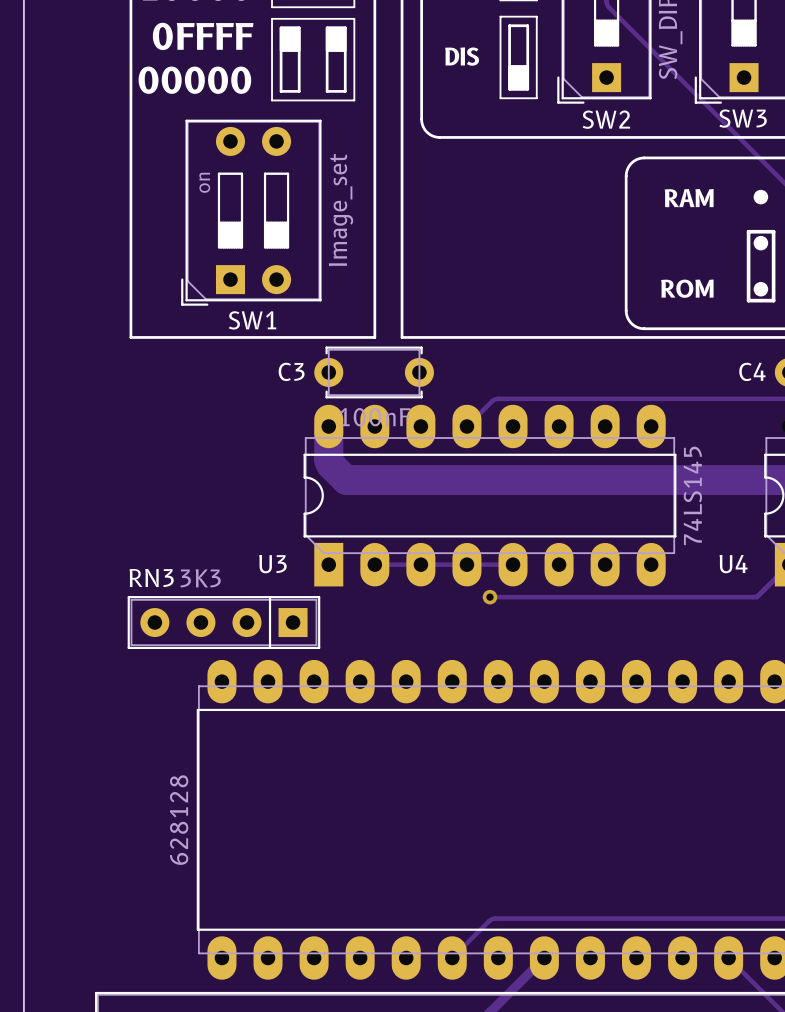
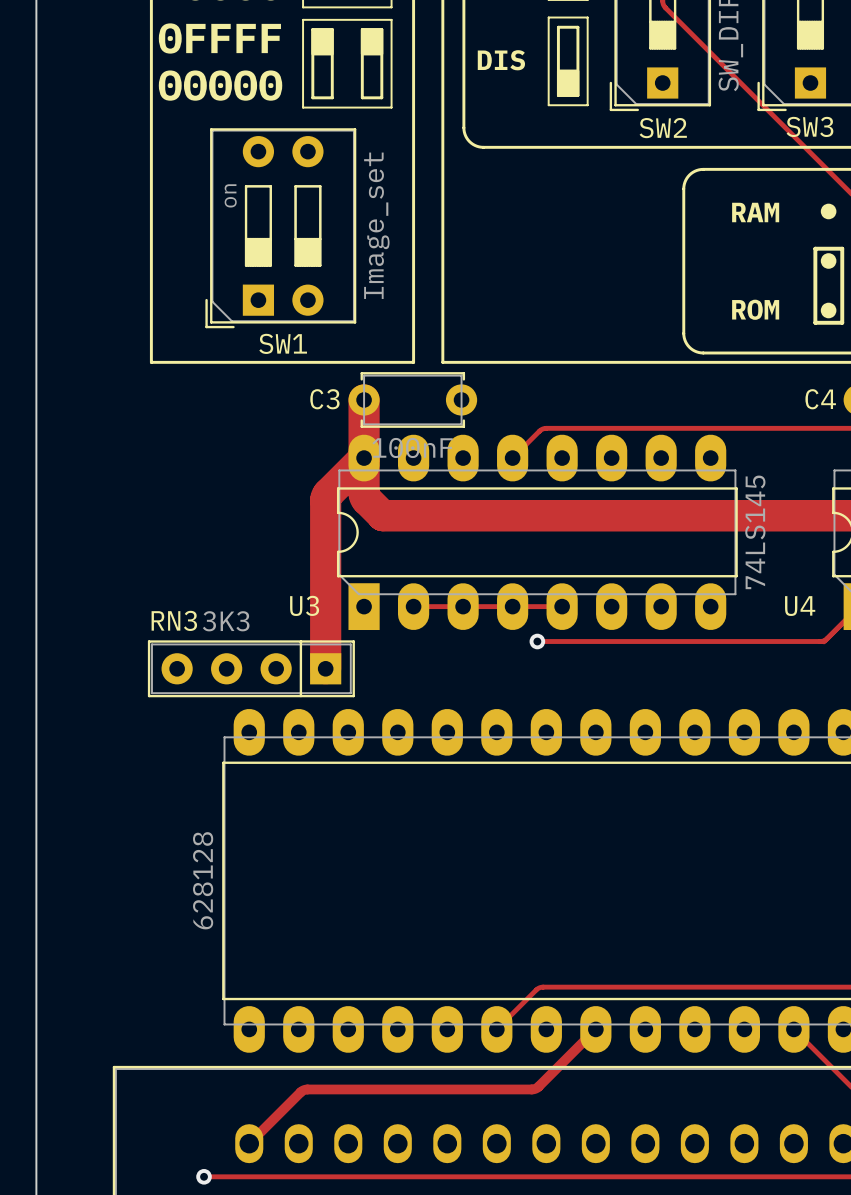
track: none -> (364, 399) (364, 458) (328, 493) (325, 499) (325, 668)

